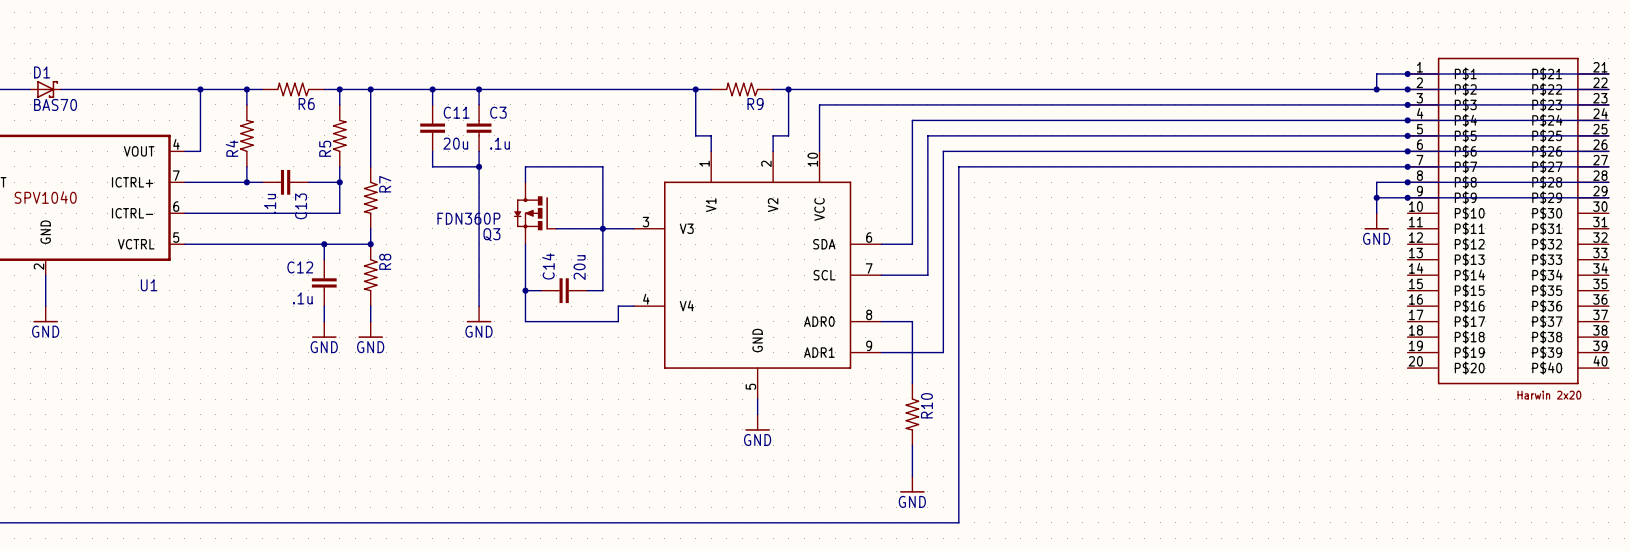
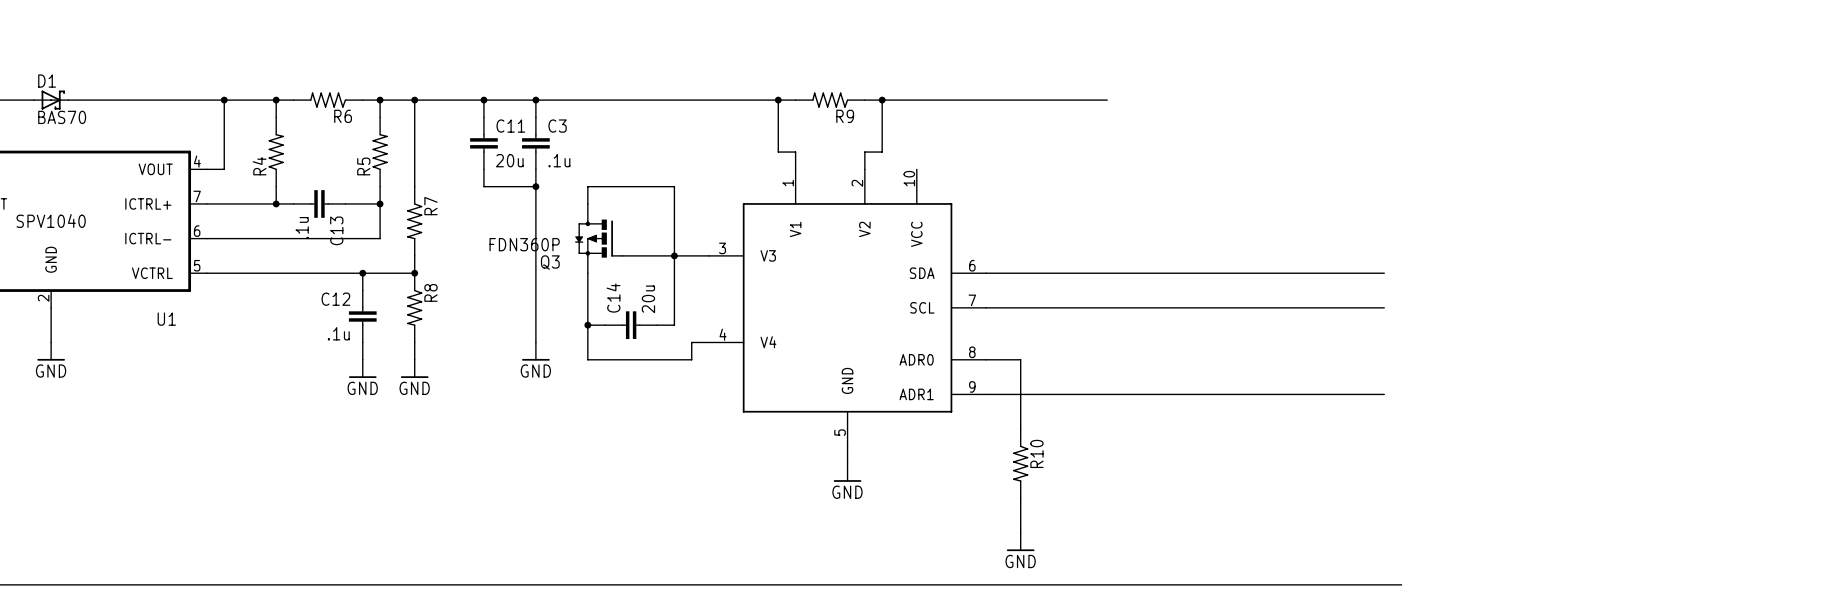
junction: (1407, 73) -> none
wire: (1608, 73) (1376, 73) (1376, 89) -> none
wire: (989, 89) (1608, 89) -> none
junction: (1376, 89) -> none
junction: (1407, 89) -> none
junction: (1407, 104) -> none
wire: (1608, 104) (819, 104) (819, 151) -> none
junction: (1407, 120) -> none
wire: (1608, 120) (912, 120) (912, 244) -> (1384, 273) (1020, 273)
junction: (1407, 135) -> none
wire: (1608, 135) (927, 135) (927, 275) -> (1384, 307) (1038, 307)
junction: (1407, 151) -> none
wire: (1608, 151) (943, 151) (943, 352) -> (1384, 394) (1055, 394)
junction: (1407, 166) -> none
wire: (1608, 166) (958, 166) (958, 522) -> (1401, 584) (1072, 584)
junction: (1407, 182) -> none
wire: (1608, 182) (1376, 182) (1376, 213) -> none
wire: (1376, 197) (1608, 197) -> none
junction: (1376, 197) -> none
junction: (1407, 197) -> none
power symbol: GND (1376, 221) -> none
part: (1508, 221) -> none

